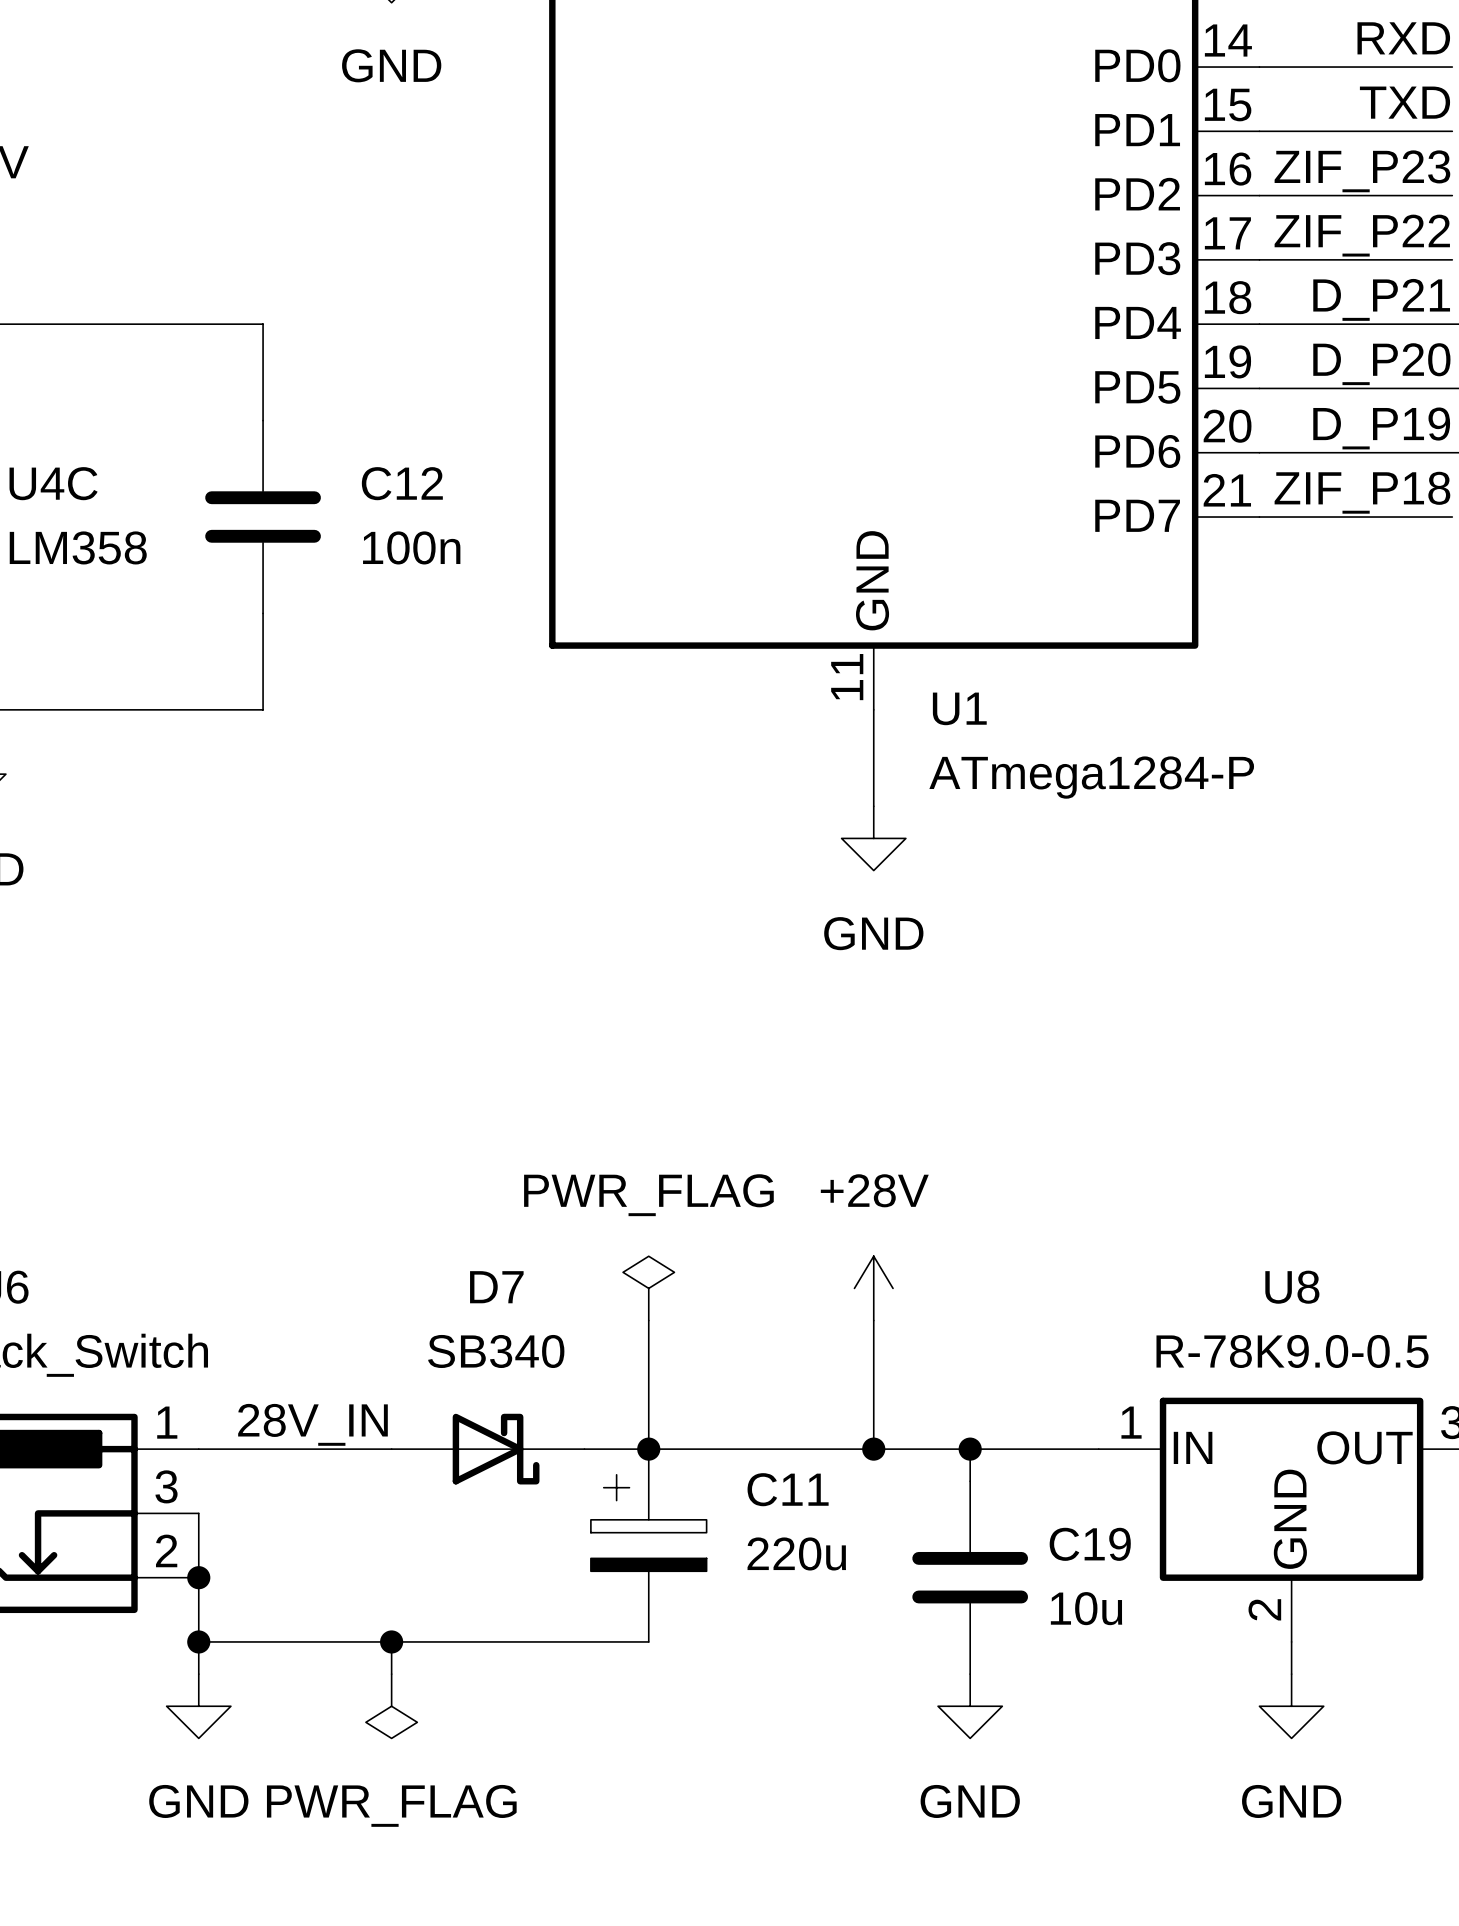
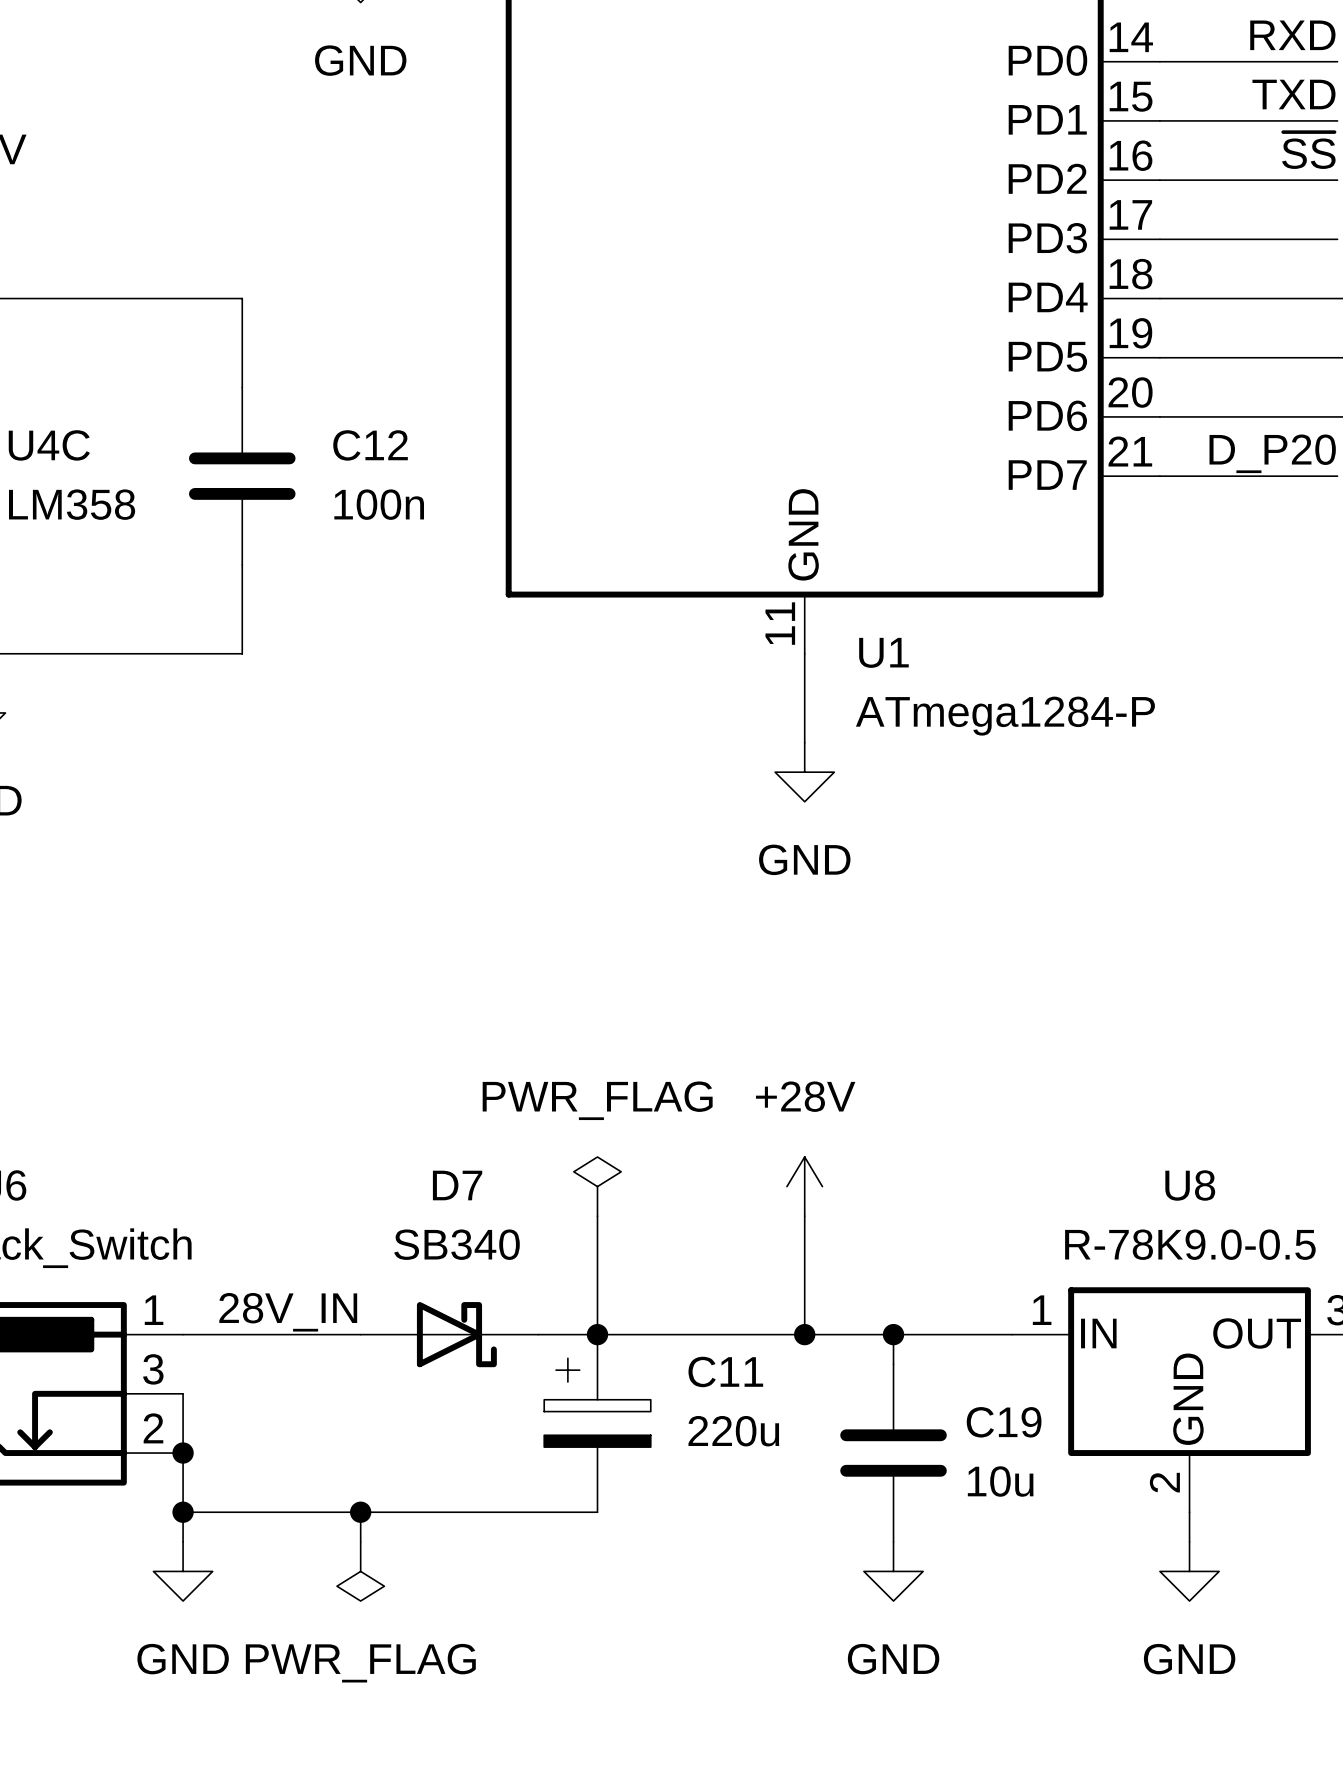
label: ZIF_P23 (1362, 171) -> ~{SS} (1308, 150)
label: ZIF_P22 (1362, 235) -> none
label: D_P21 (1381, 299) -> none
label: D_P20 (1381, 364) -> none
label: D_P19 (1381, 428) -> none
label: ZIF_P18 (1362, 492) -> D_P20 (1272, 453)

